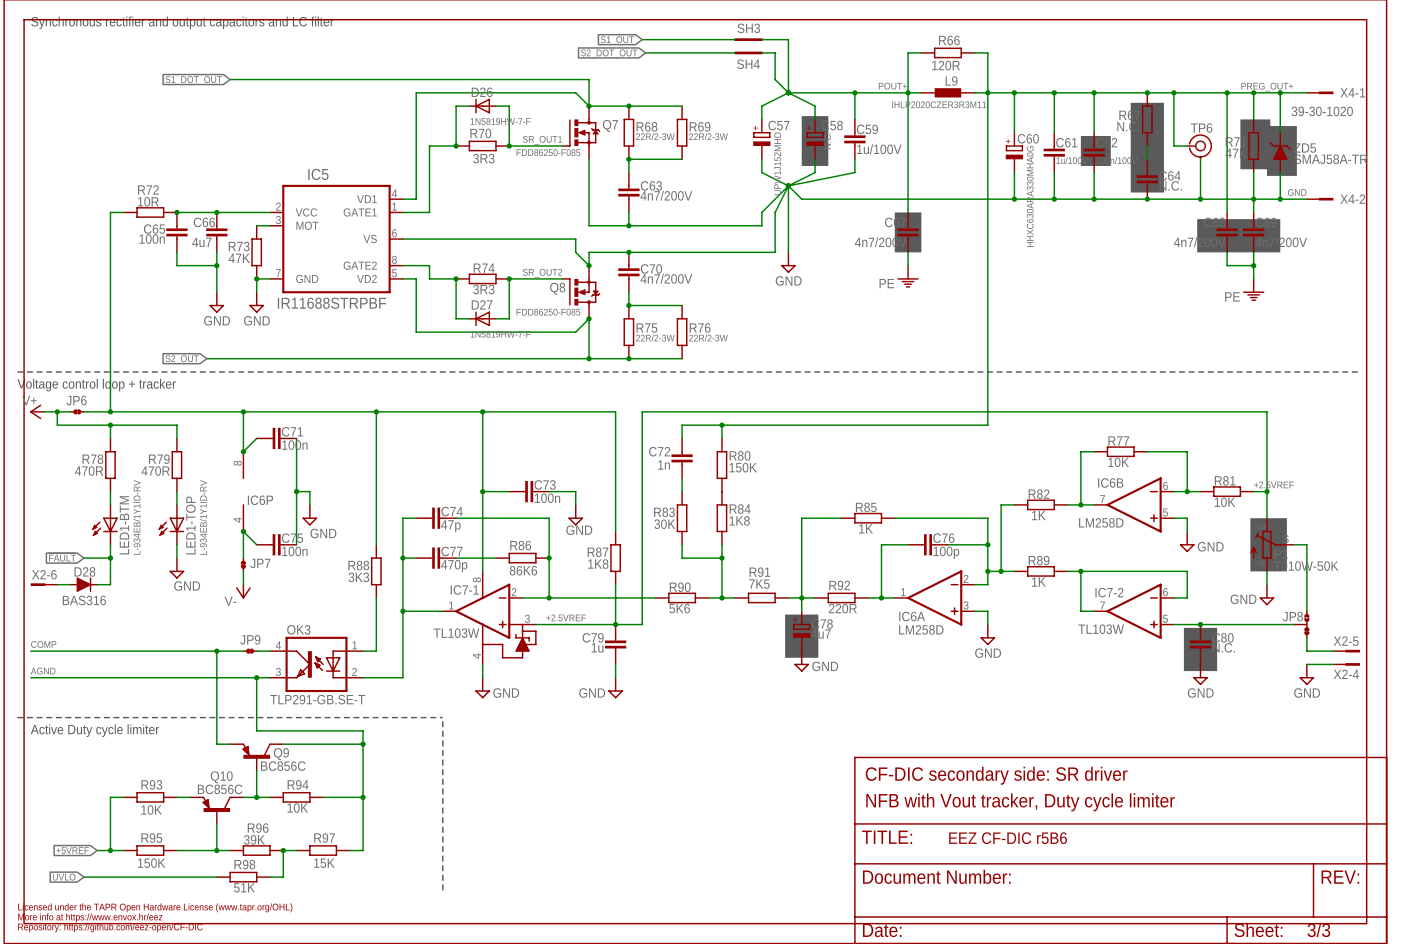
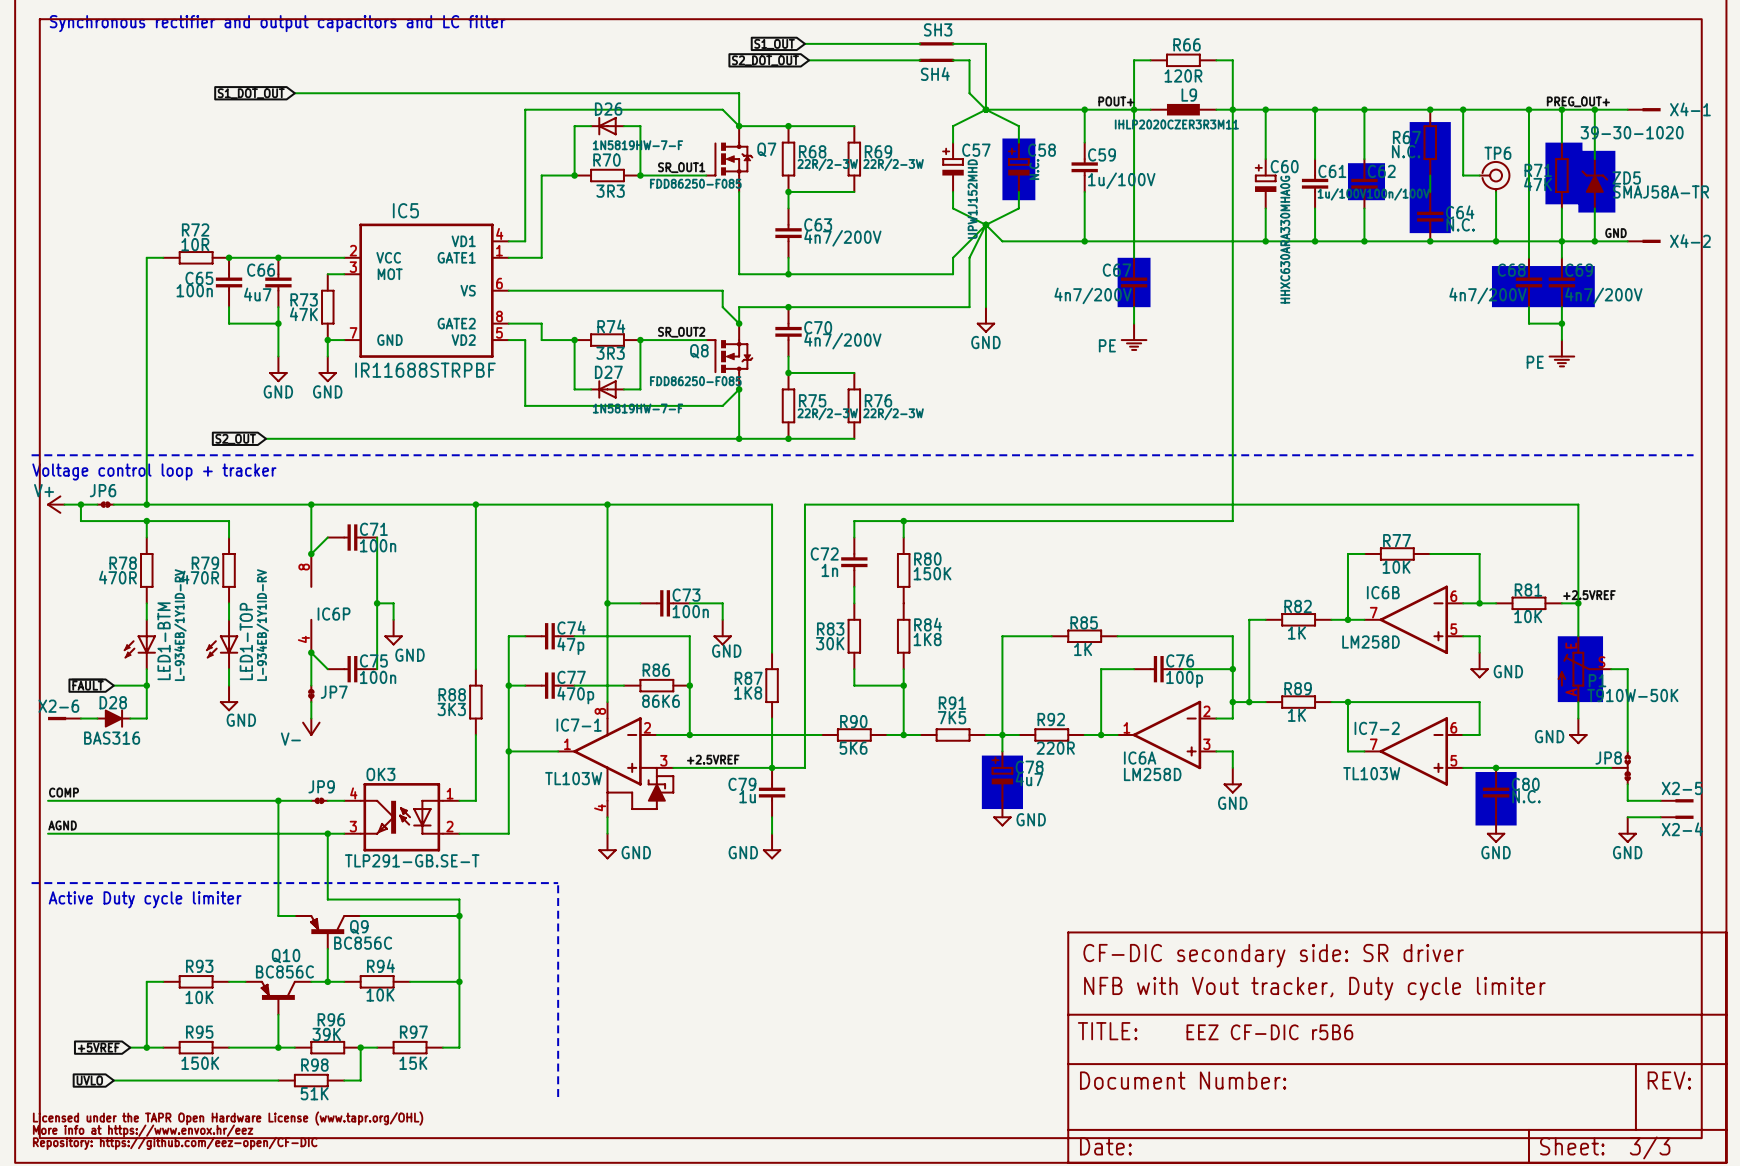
wire: (854, 92) (854, 119) -> (1084, 109) (1084, 142)
junction position: (854, 92) -> (1084, 109)
C59 position: (854, 139) -> (1084, 167)
wire: (854, 159) (854, 172) (788, 185) -> none
wire: none -> (1084, 191) (1084, 241)
junction: none -> (1084, 241)

